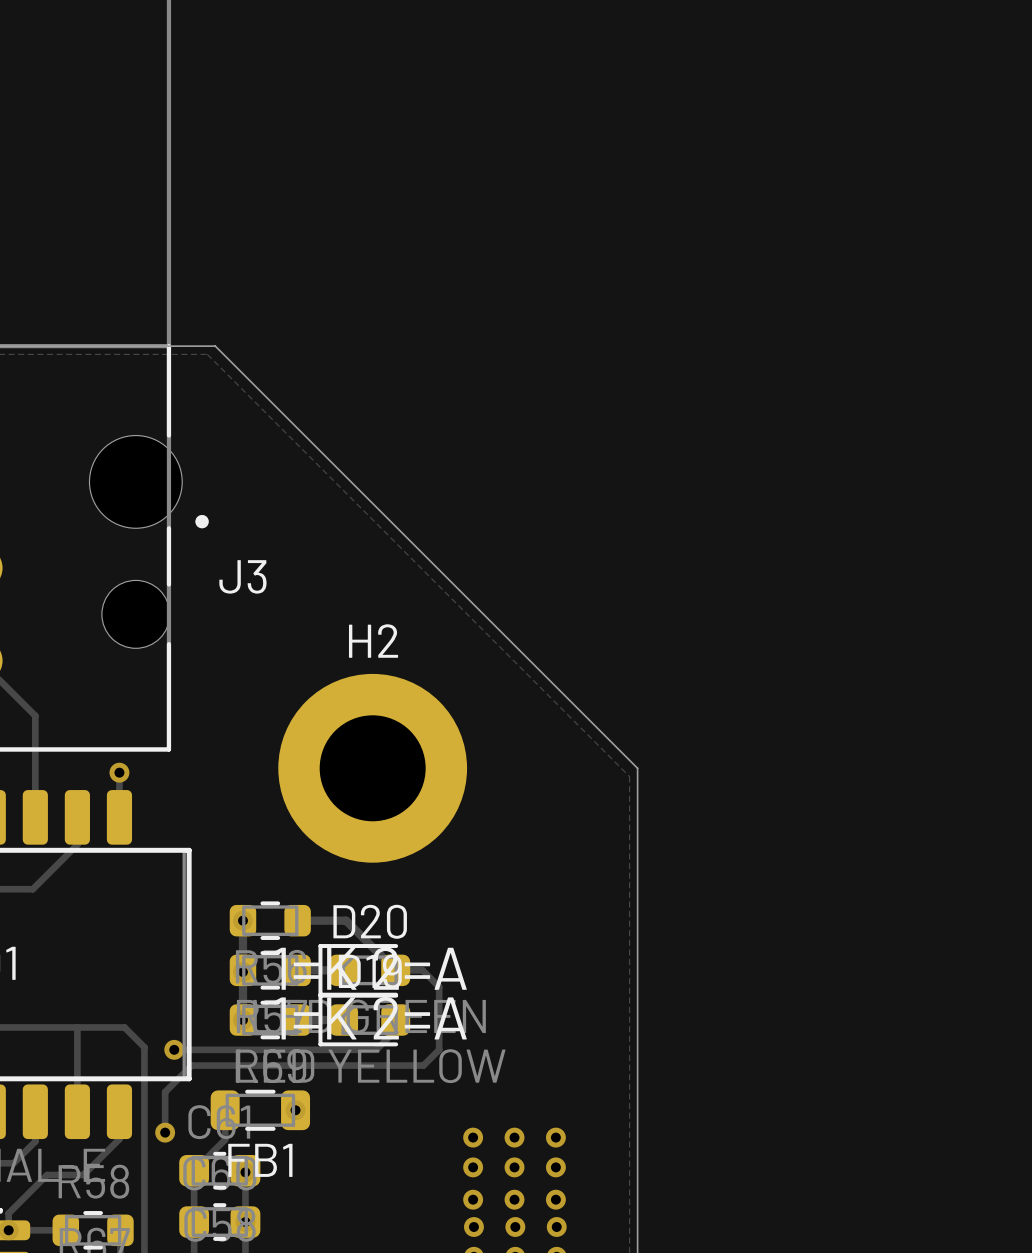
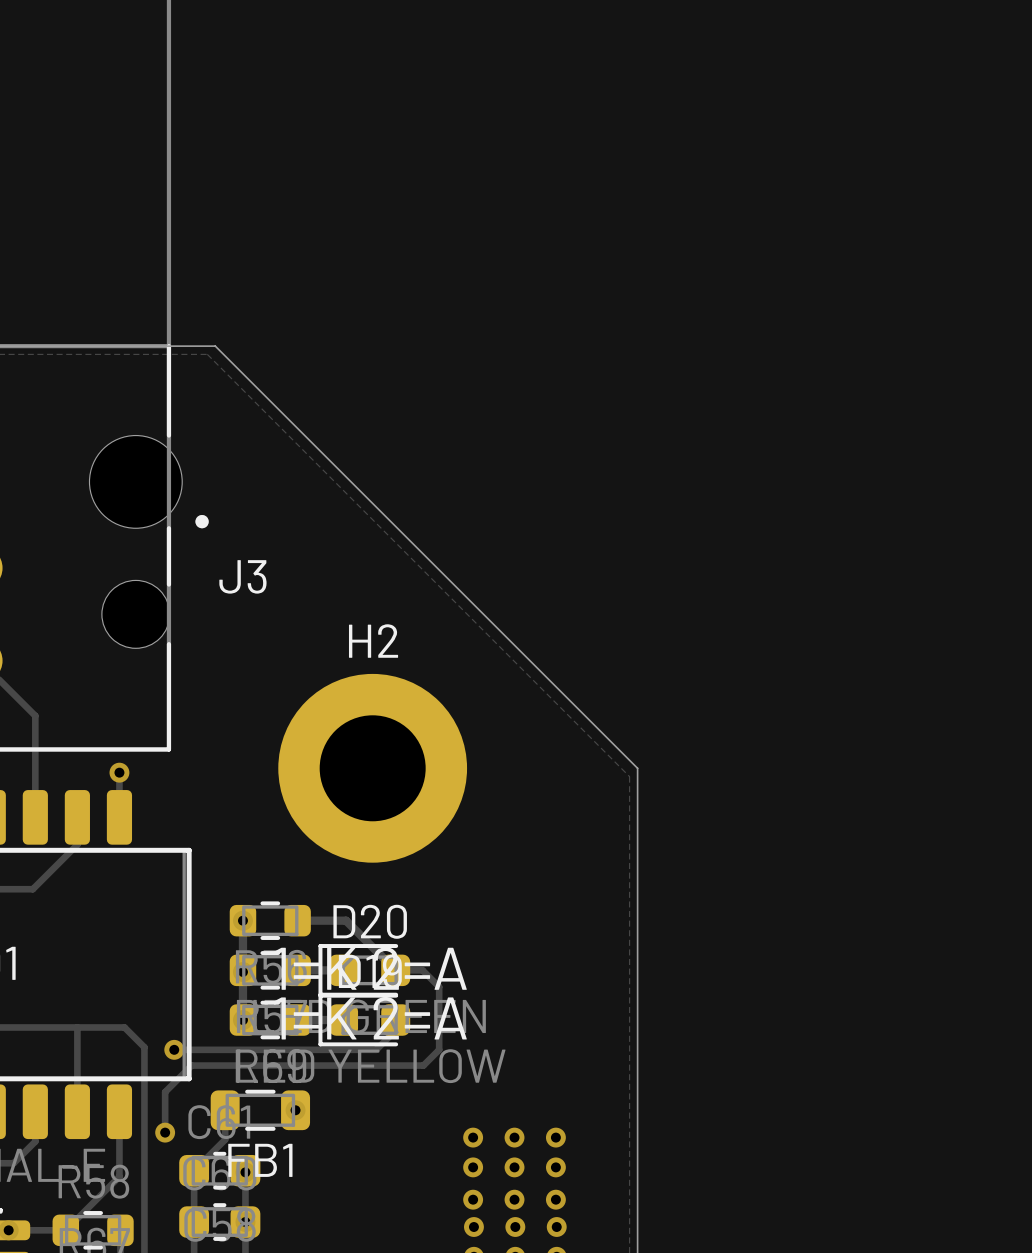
track: (119, 1139) (83, 1175) (47, 1175) (8, 1213) (8, 1230) -> (119, 1139) (119, 1176) (65, 1230)

